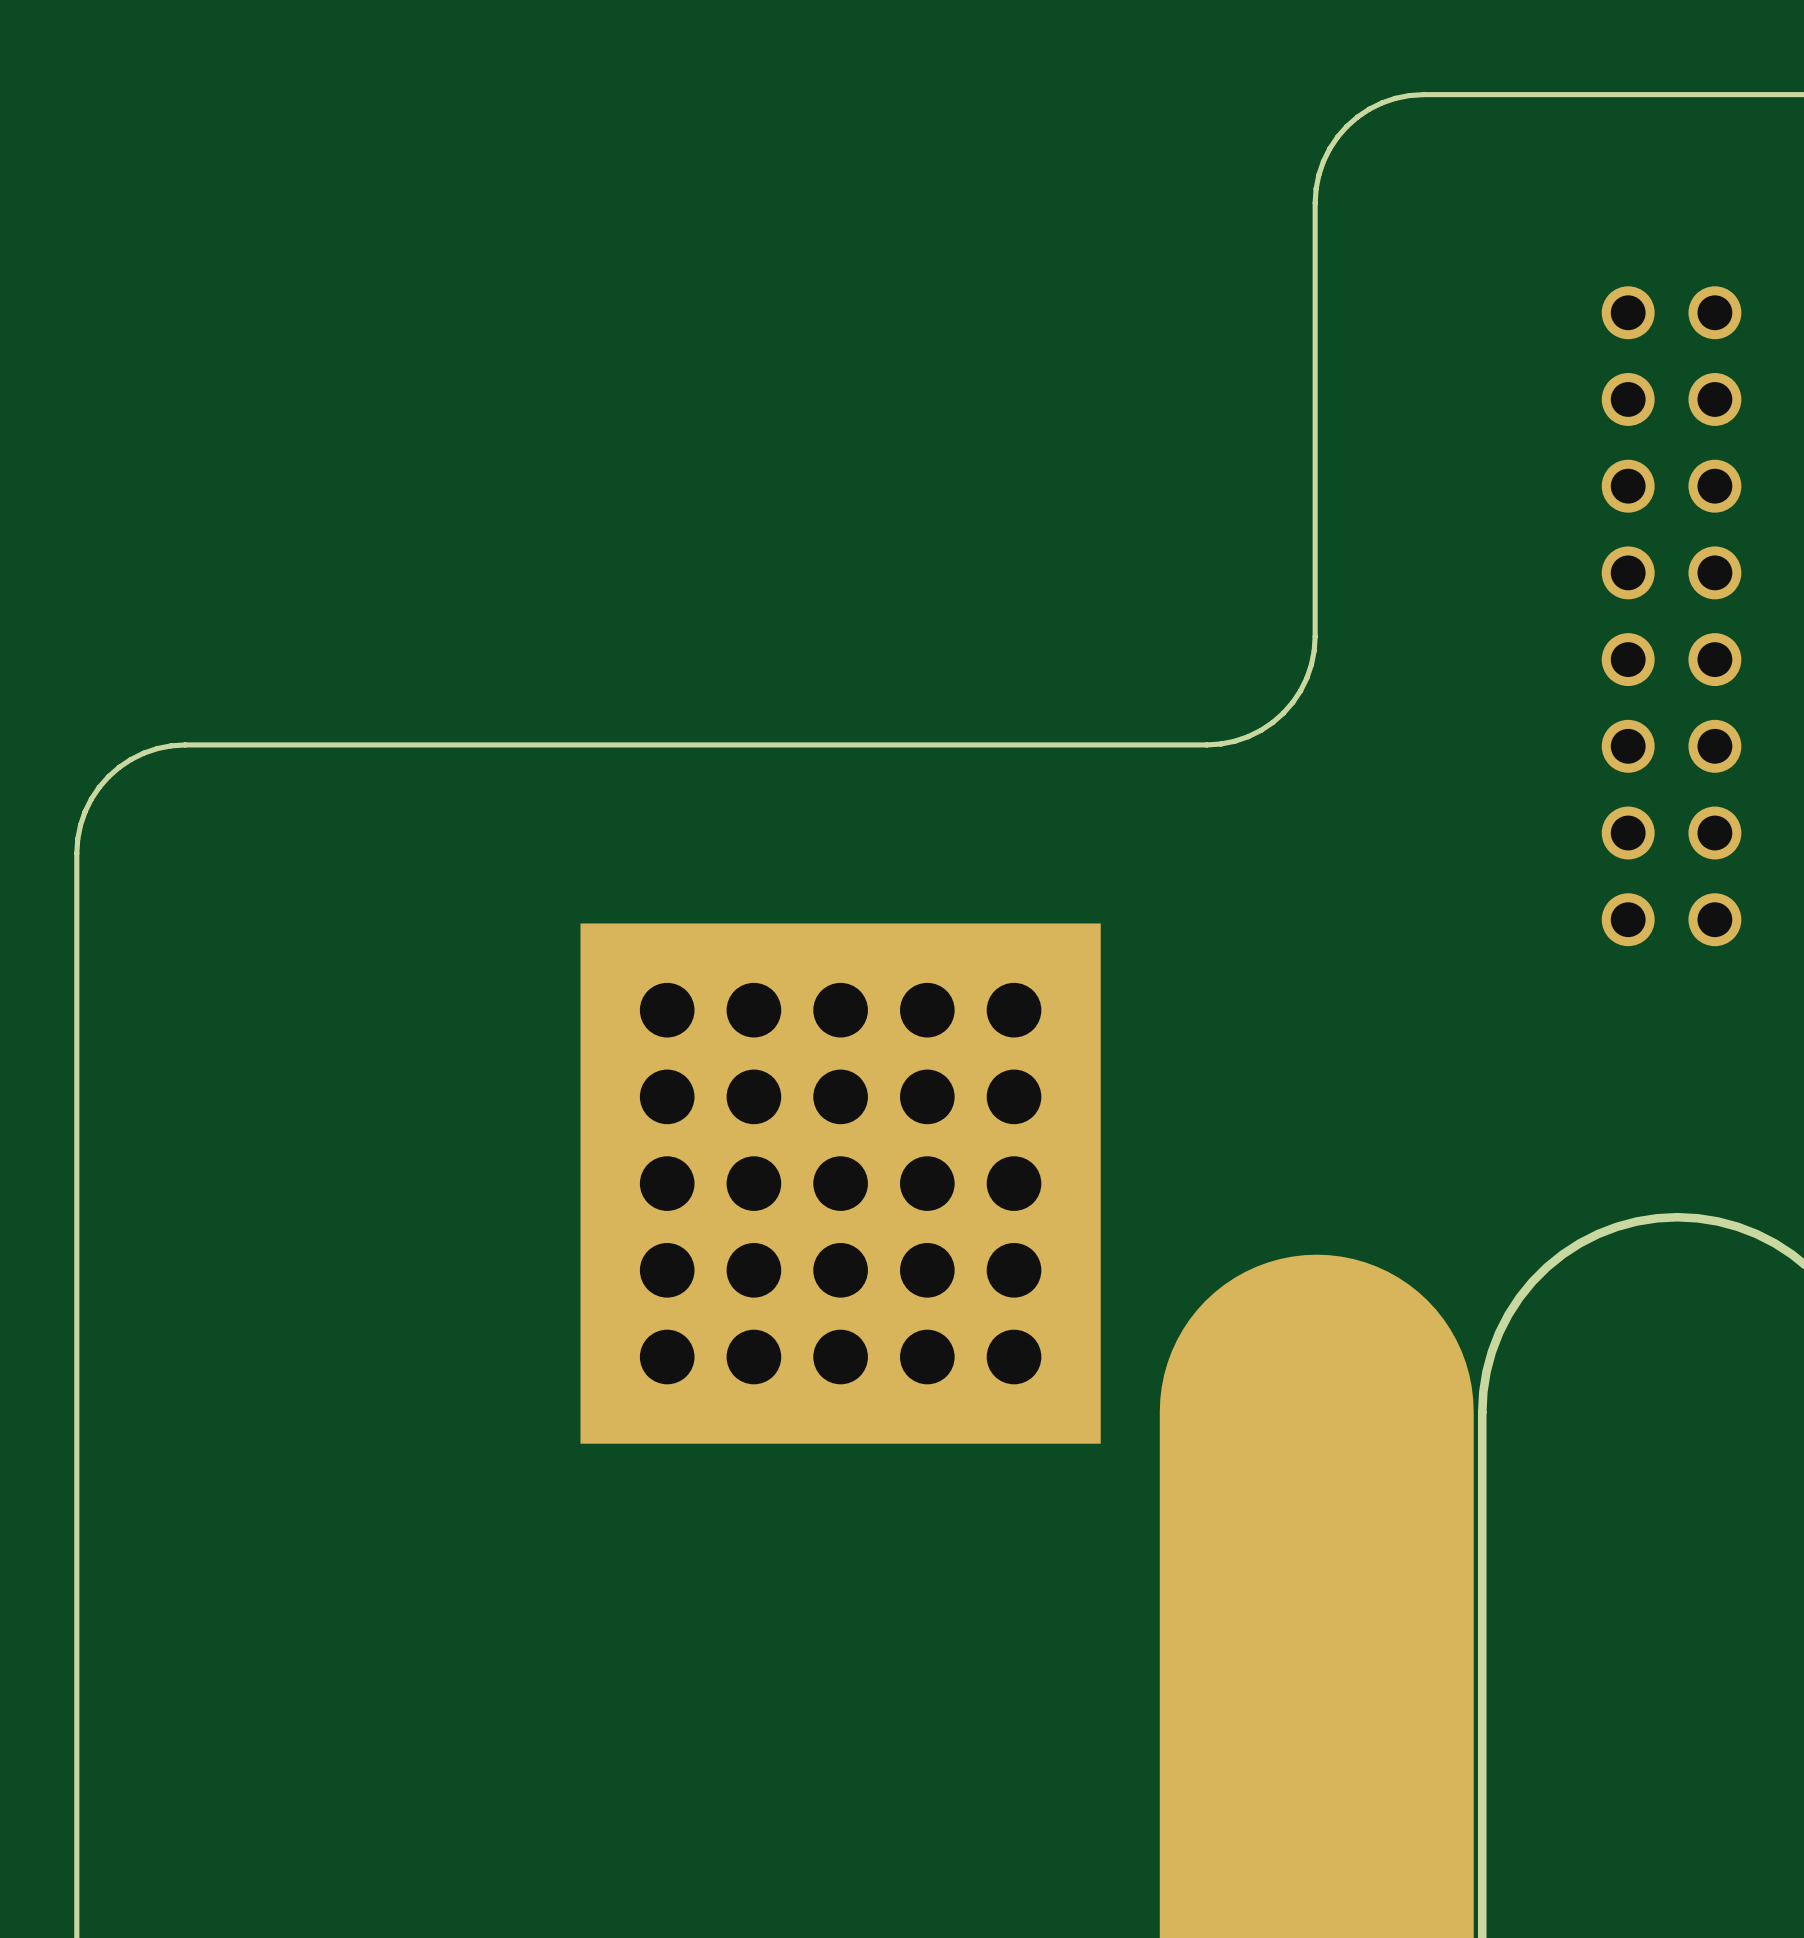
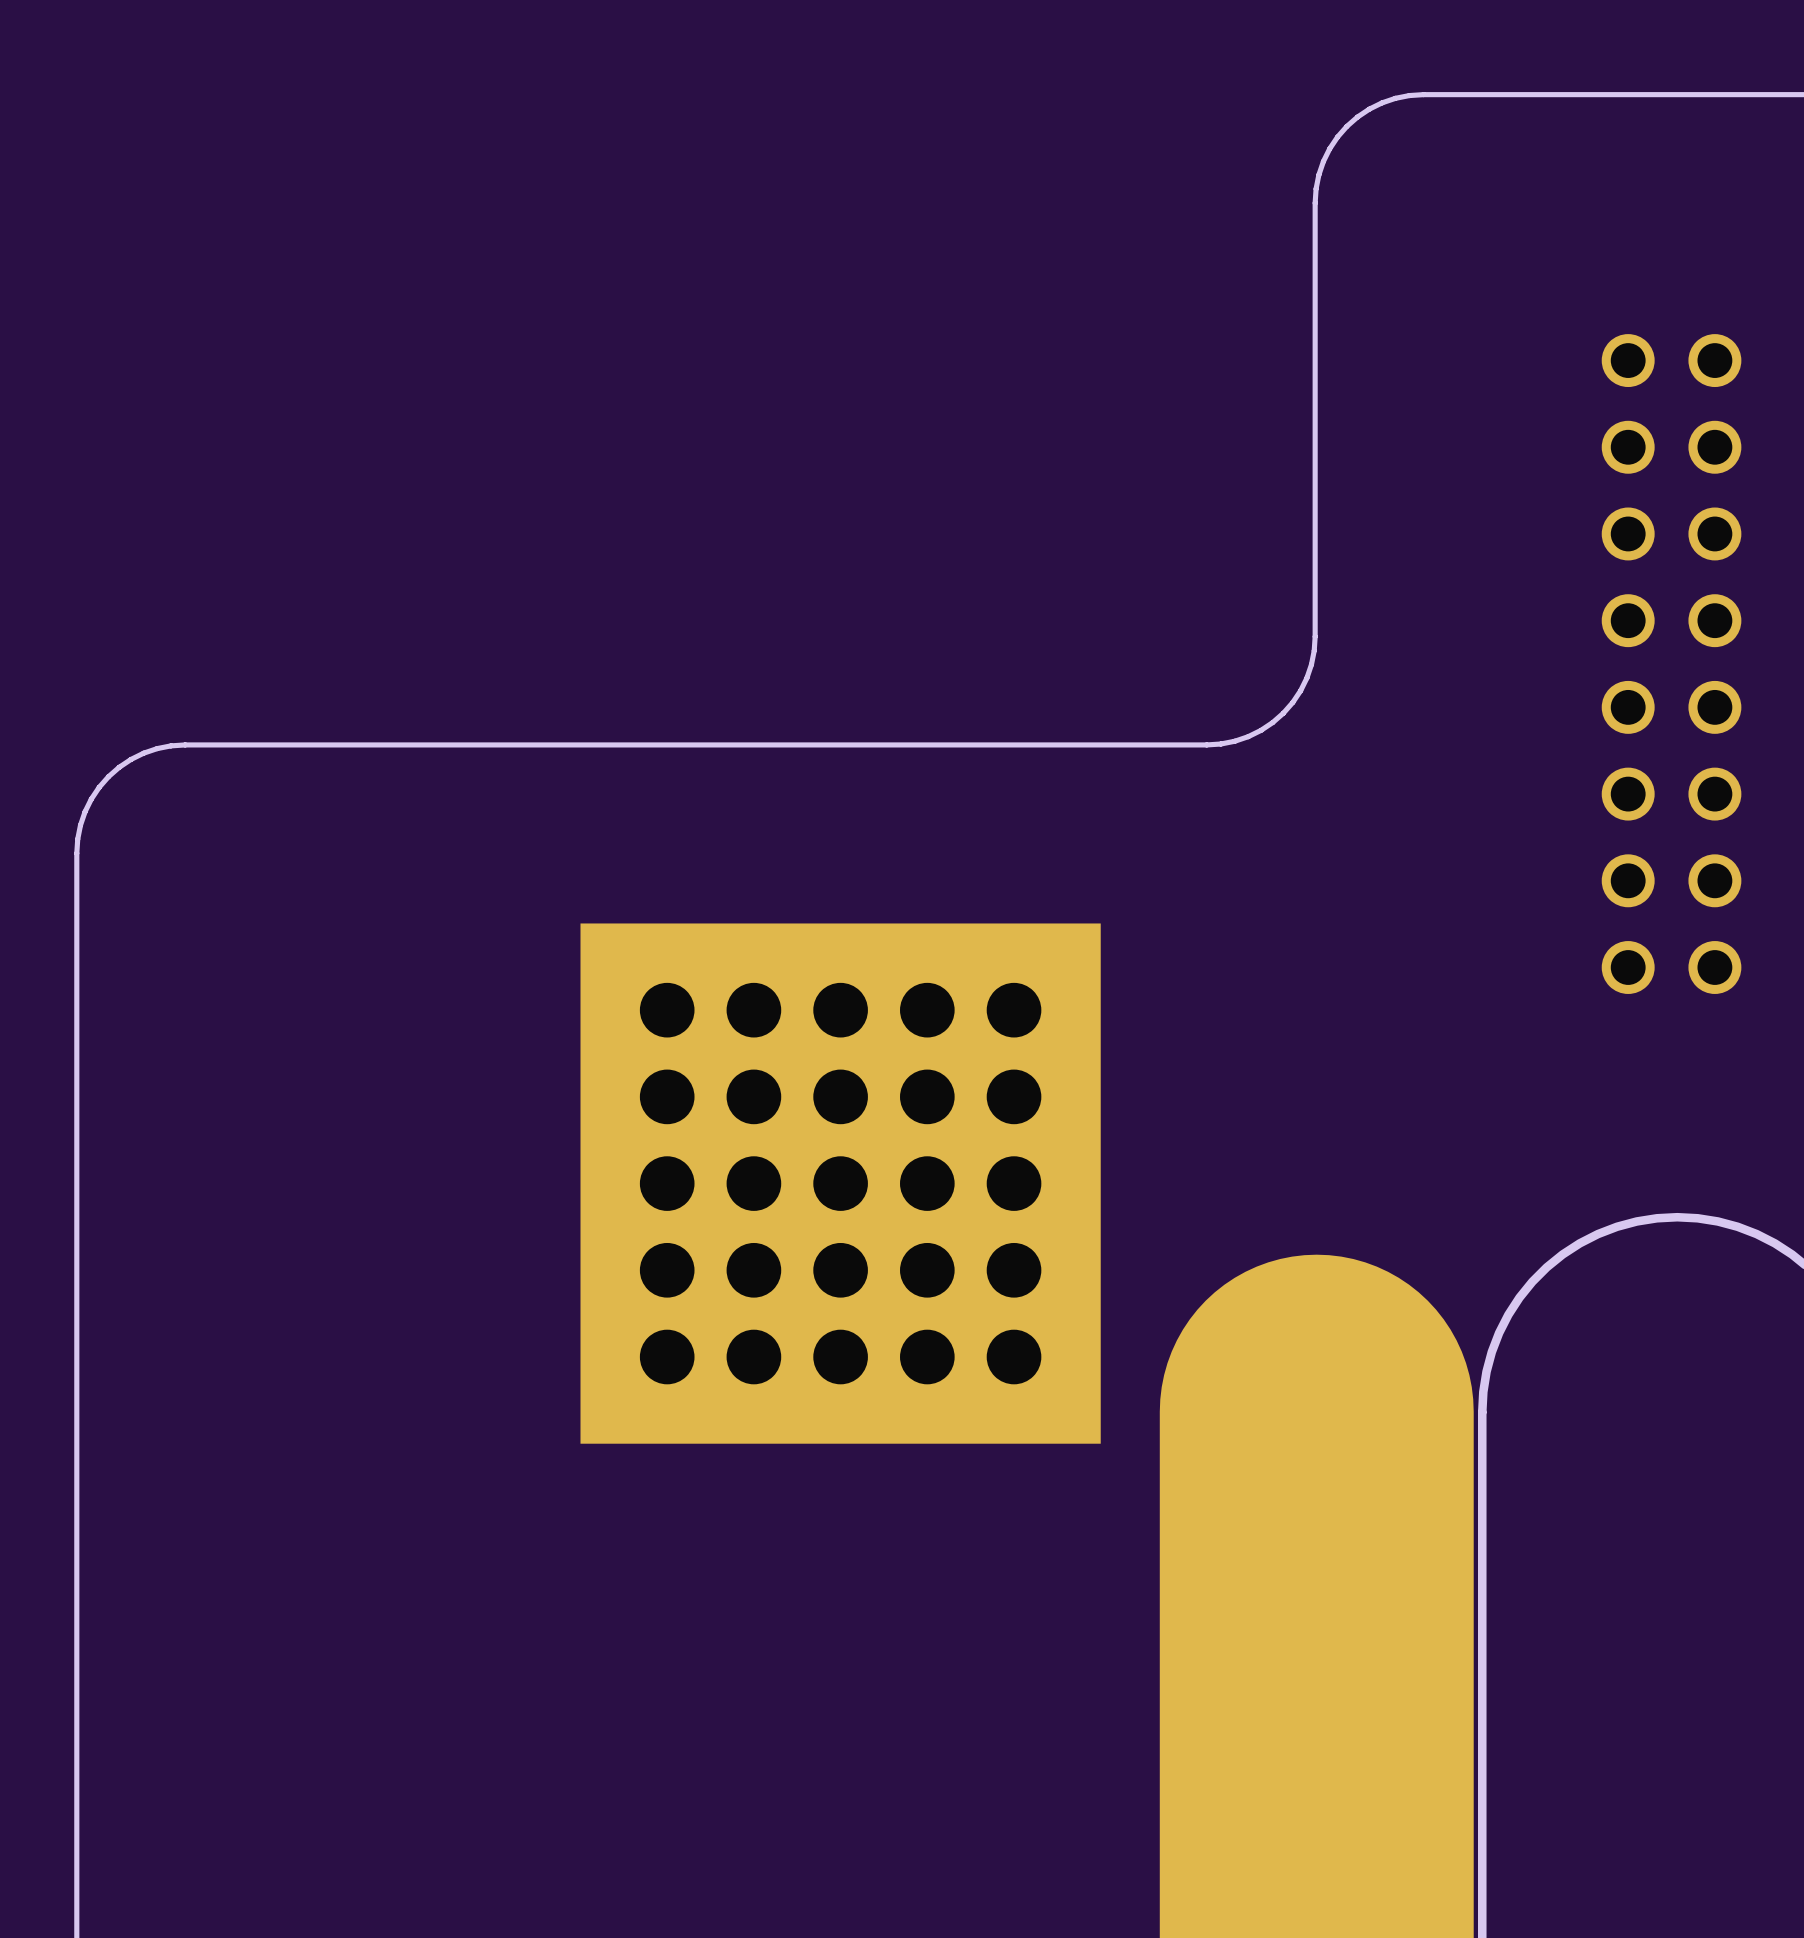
part position: (1671, 616) -> (1671, 664)

